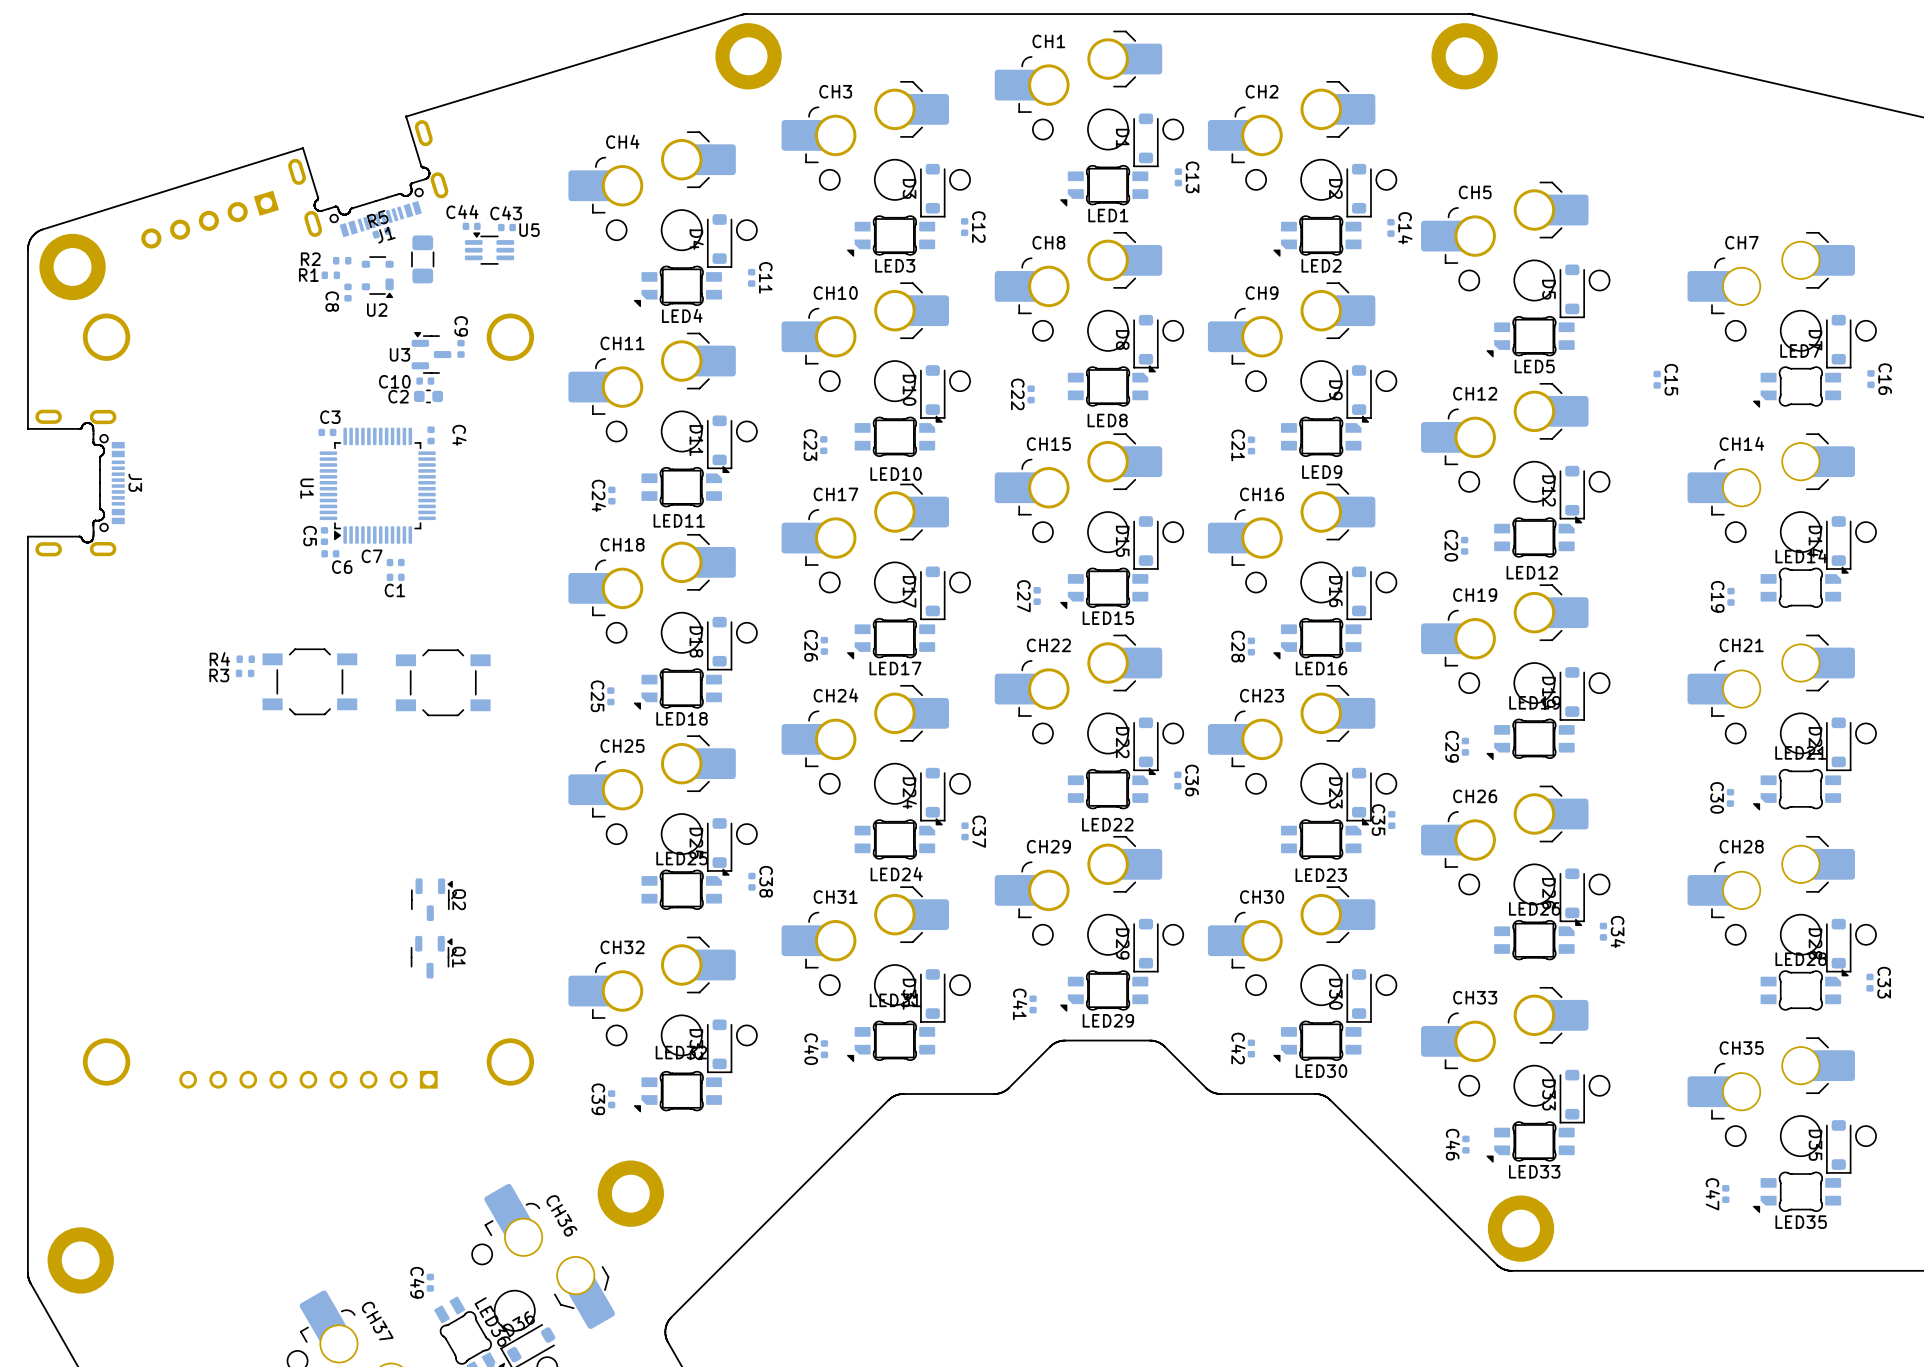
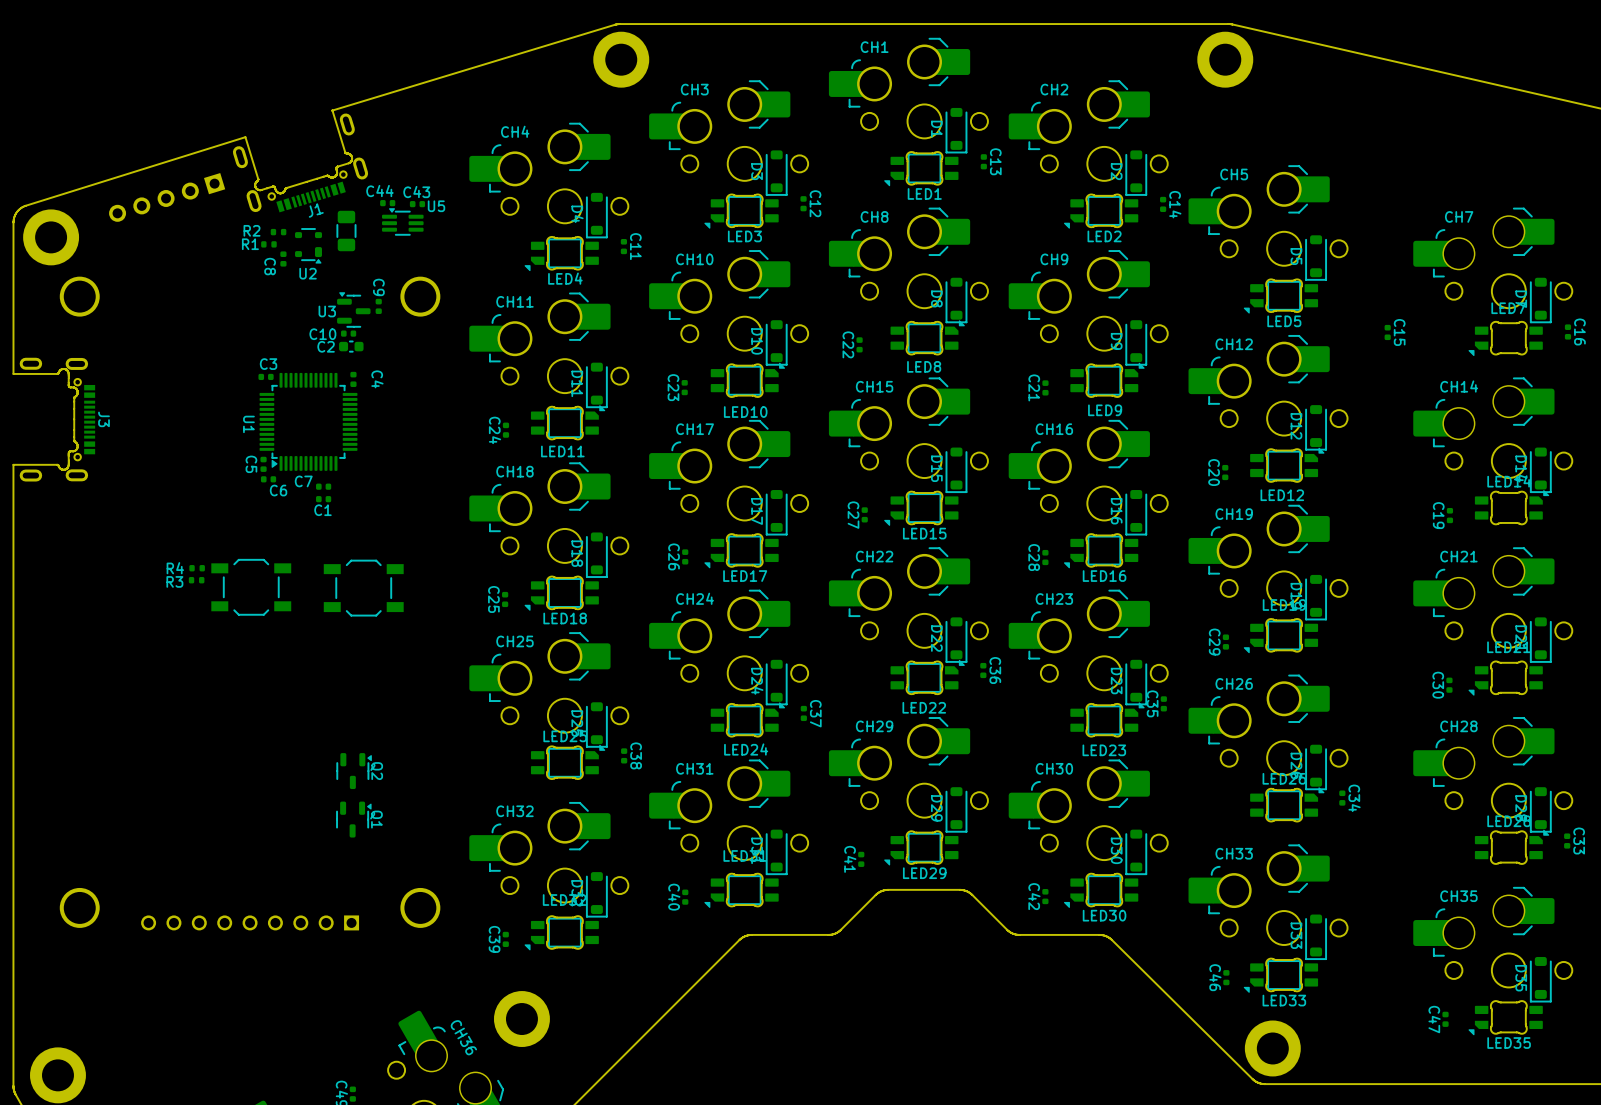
R5: (381, 232) -> none

